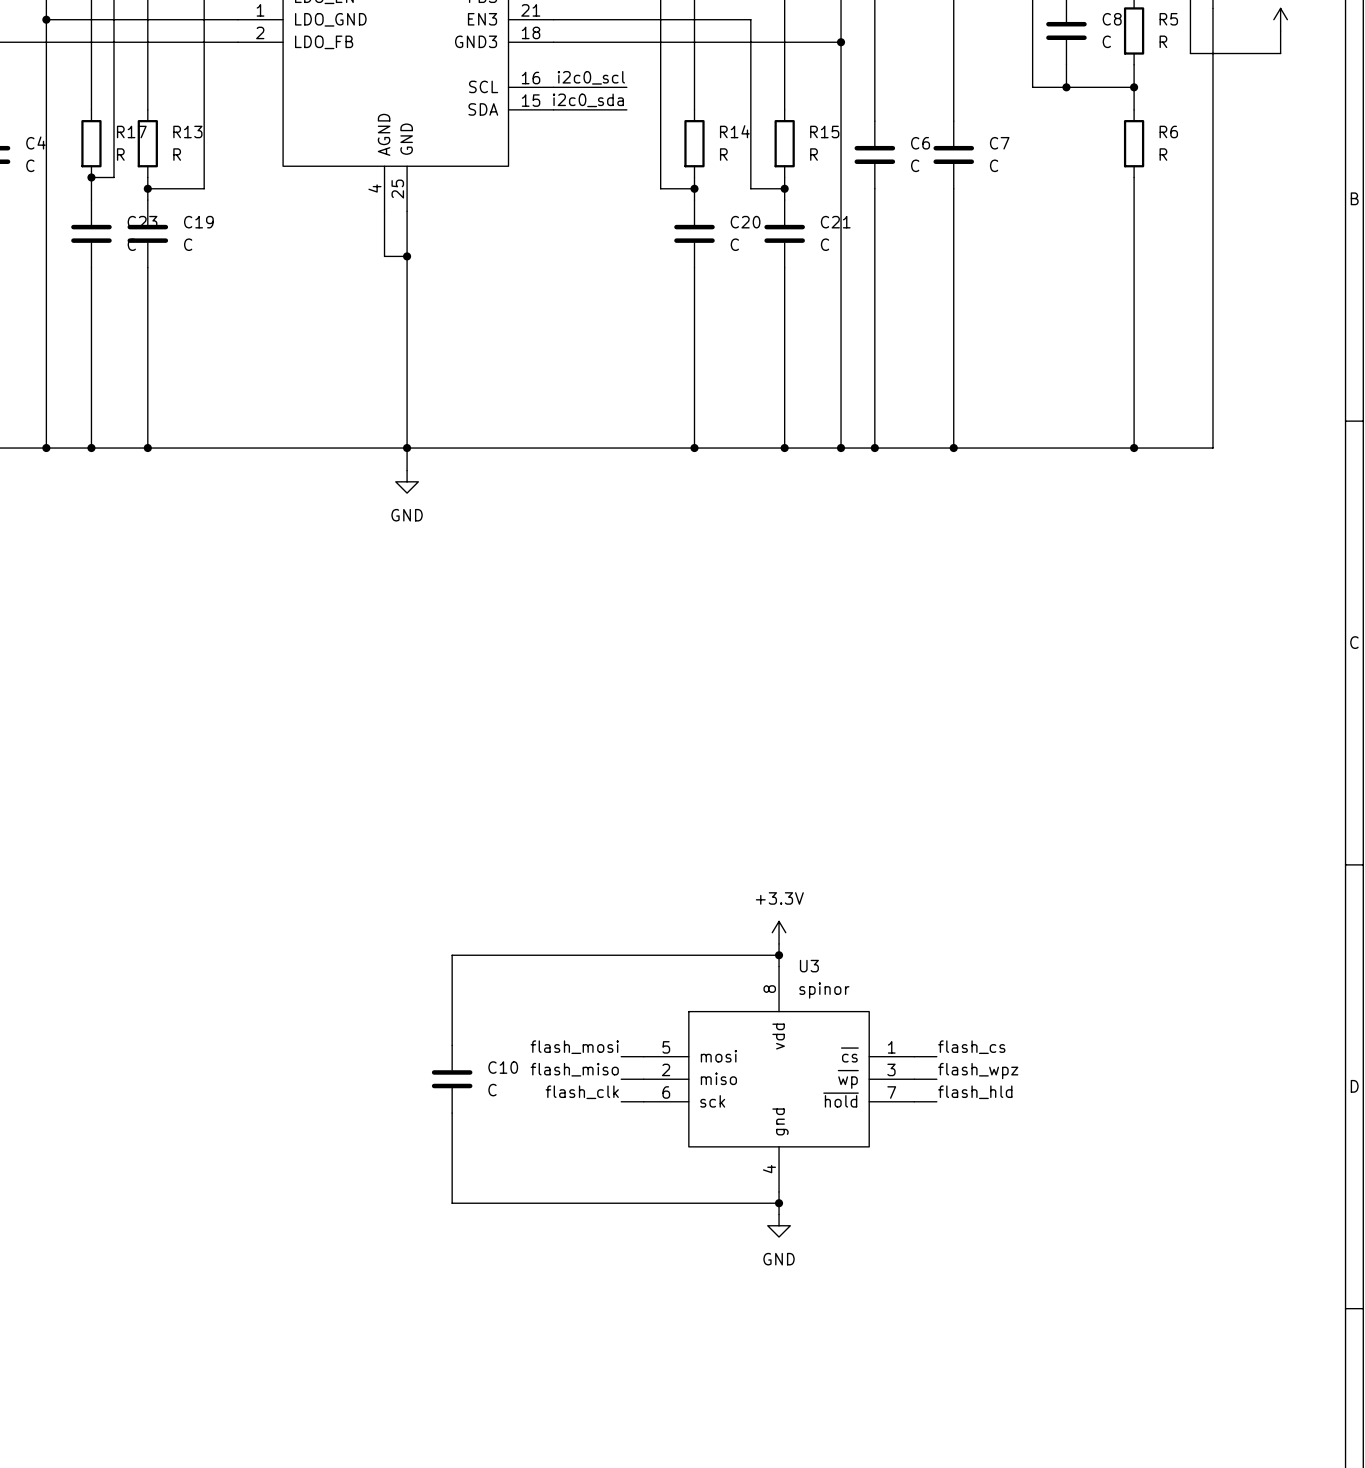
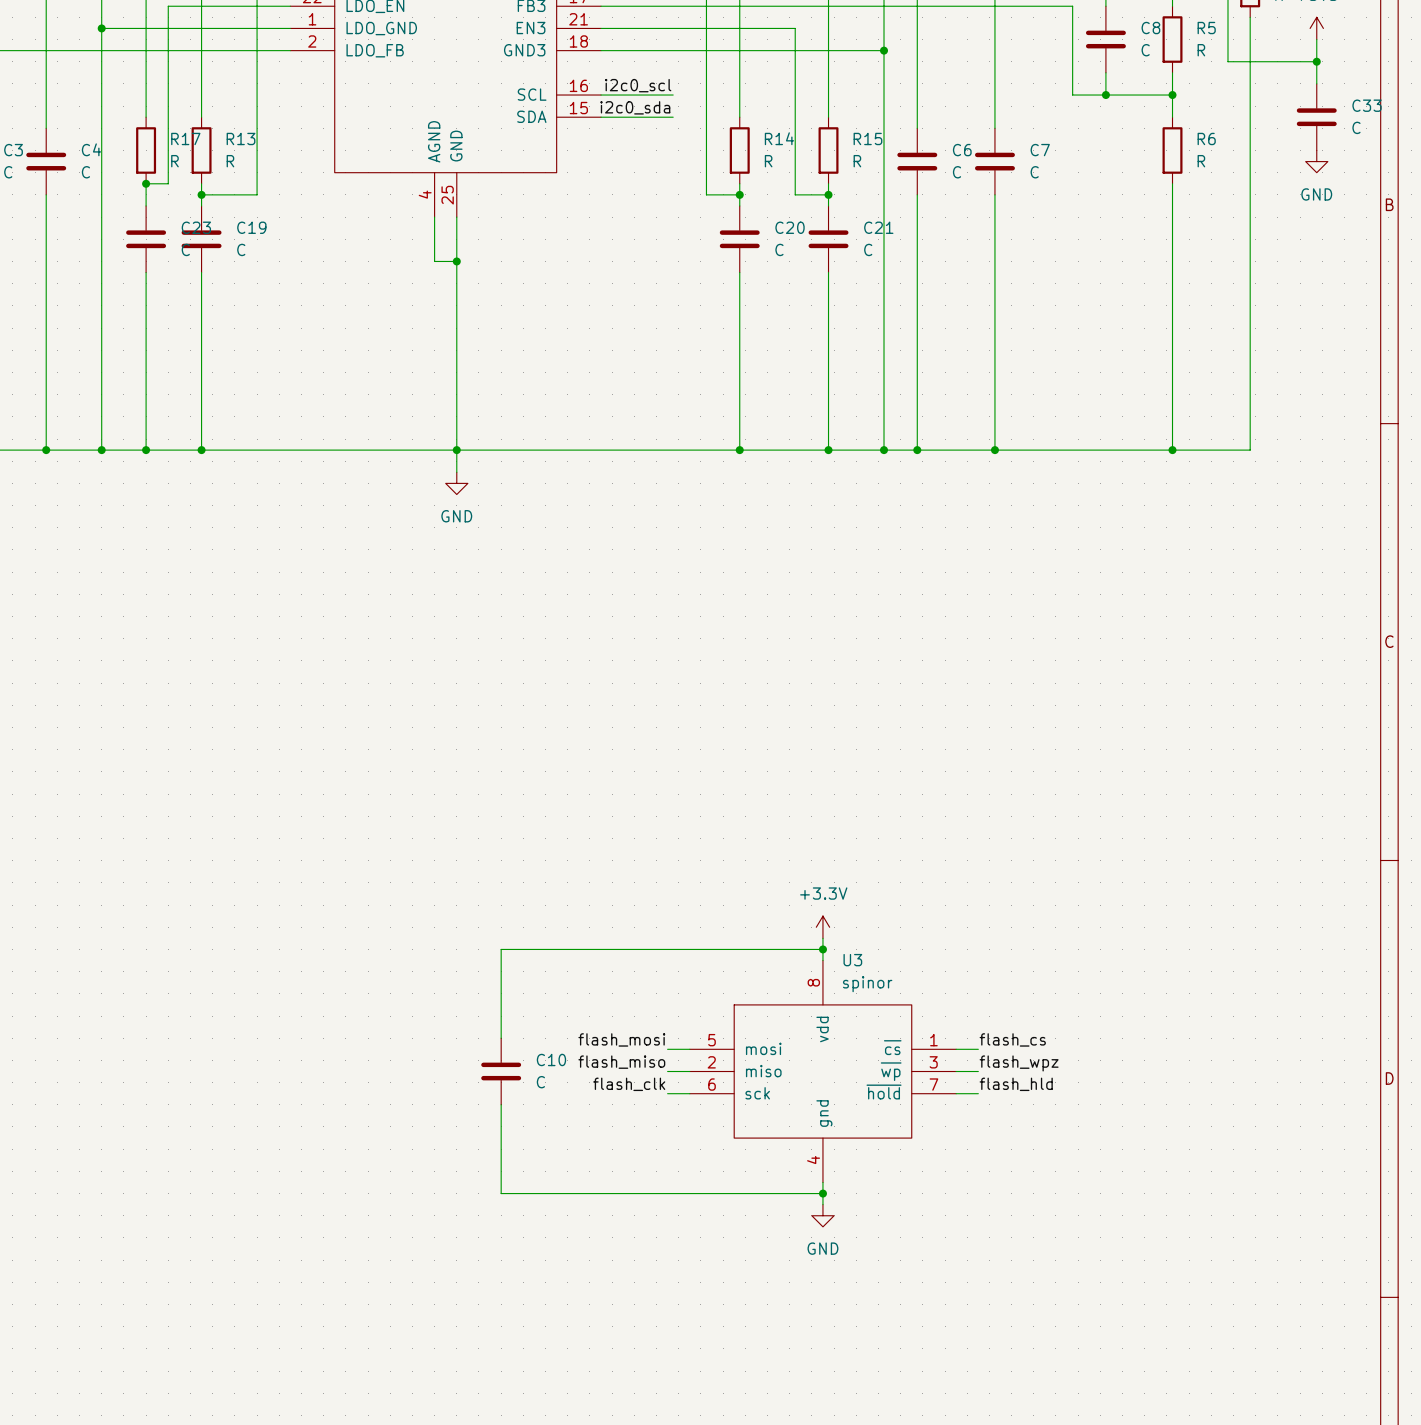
wire: none -> (1316, 61) (1316, 83)
junction: none -> (1316, 61)
C33: none -> C (1316, 117)
power symbol: none -> GND (1316, 161)

